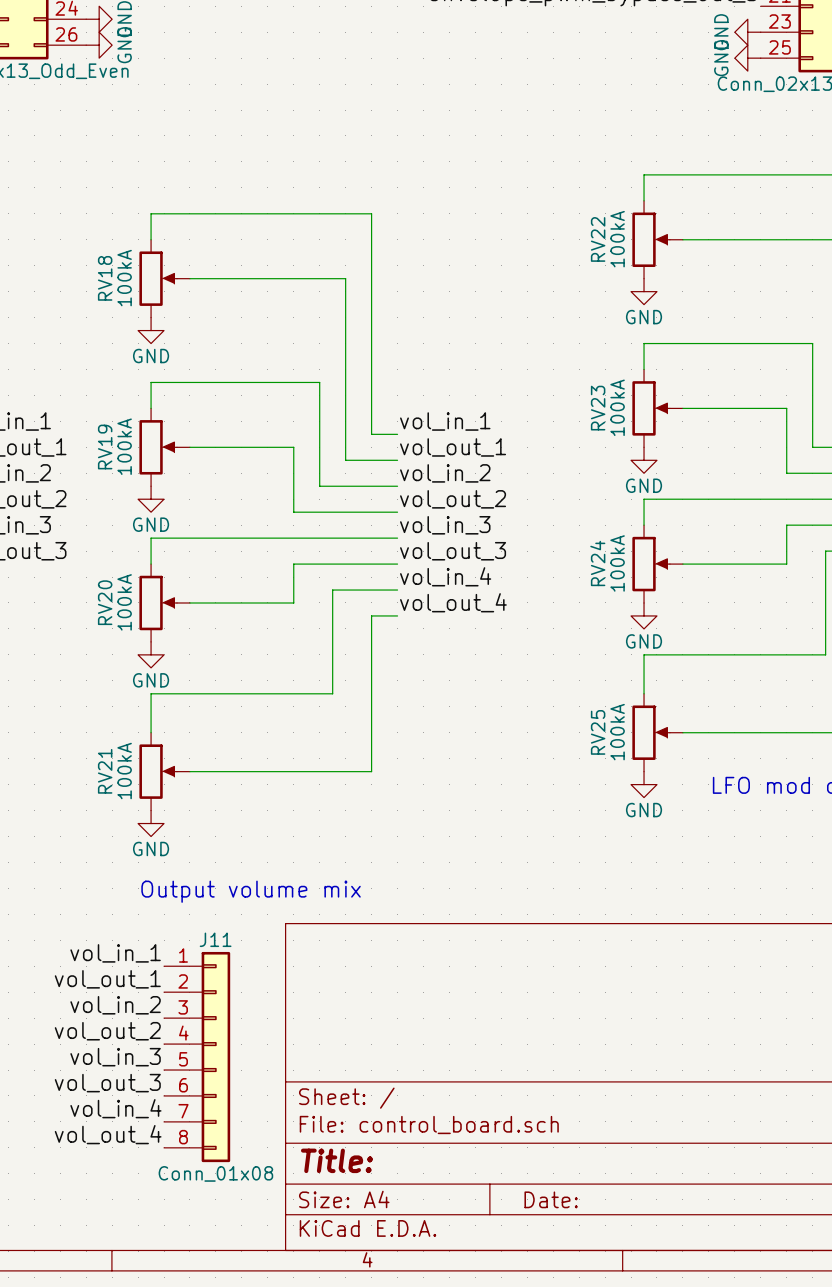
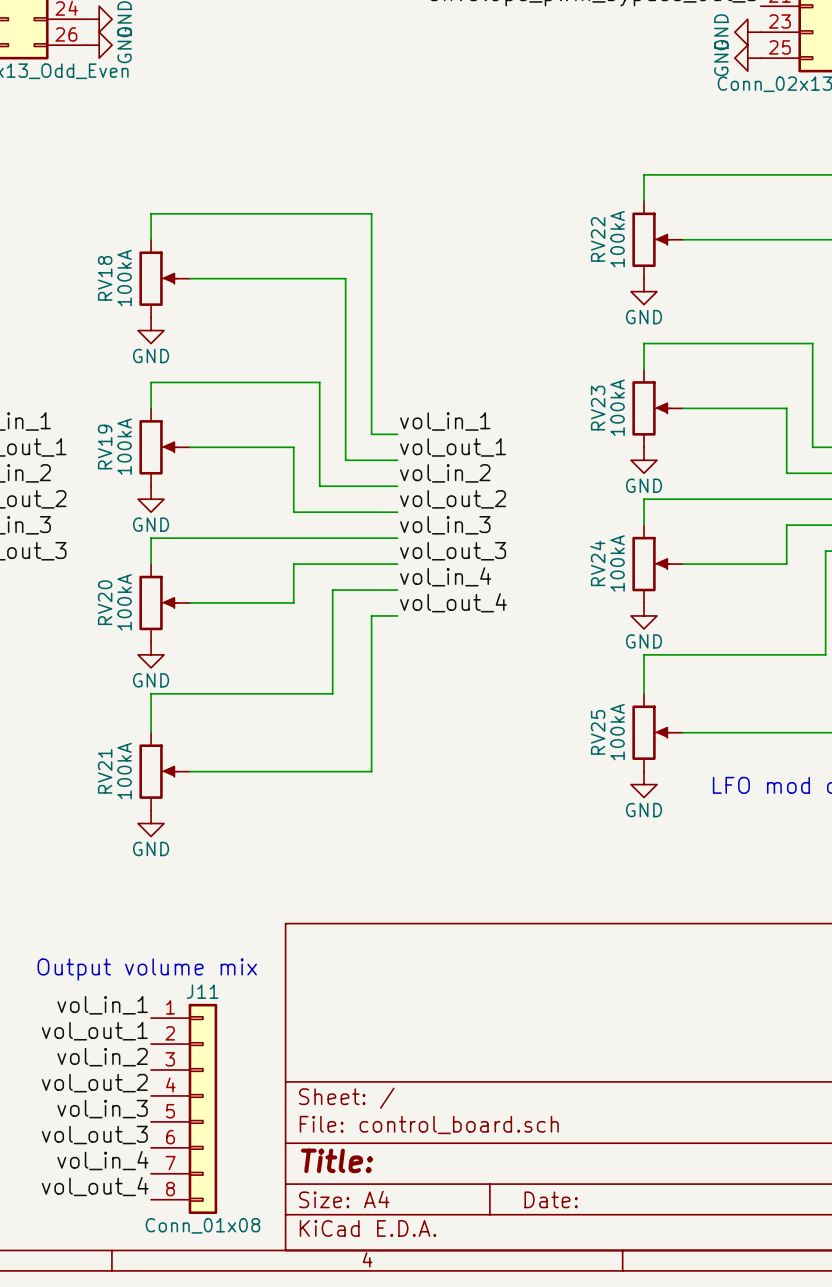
text position: Output volume mix (251, 891) -> Output volume mix (147, 969)
label position: vol_in_1 (115, 953) -> vol_in_1 (102, 1005)
label position: vol_out_1 (107, 979) -> vol_out_1 (94, 1031)
label position: vol_in_2 (115, 1005) -> vol_in_2 (102, 1057)
label position: vol_out_2 (107, 1031) -> vol_out_2 (94, 1083)
label position: vol_in_3 (115, 1057) -> vol_in_3 (102, 1109)
J11 position: (197, 1057) -> (184, 1108)
label position: vol_out_3 (107, 1083) -> vol_out_3 (94, 1135)
label position: vol_in_4 (115, 1108) -> vol_in_4 (102, 1160)
label position: vol_out_4 (108, 1134) -> vol_out_4 (95, 1186)

